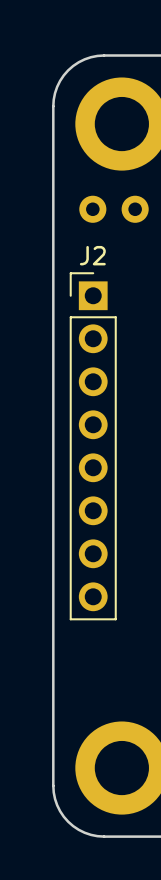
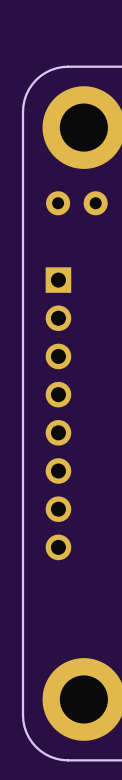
J2: (93, 446) -> none

